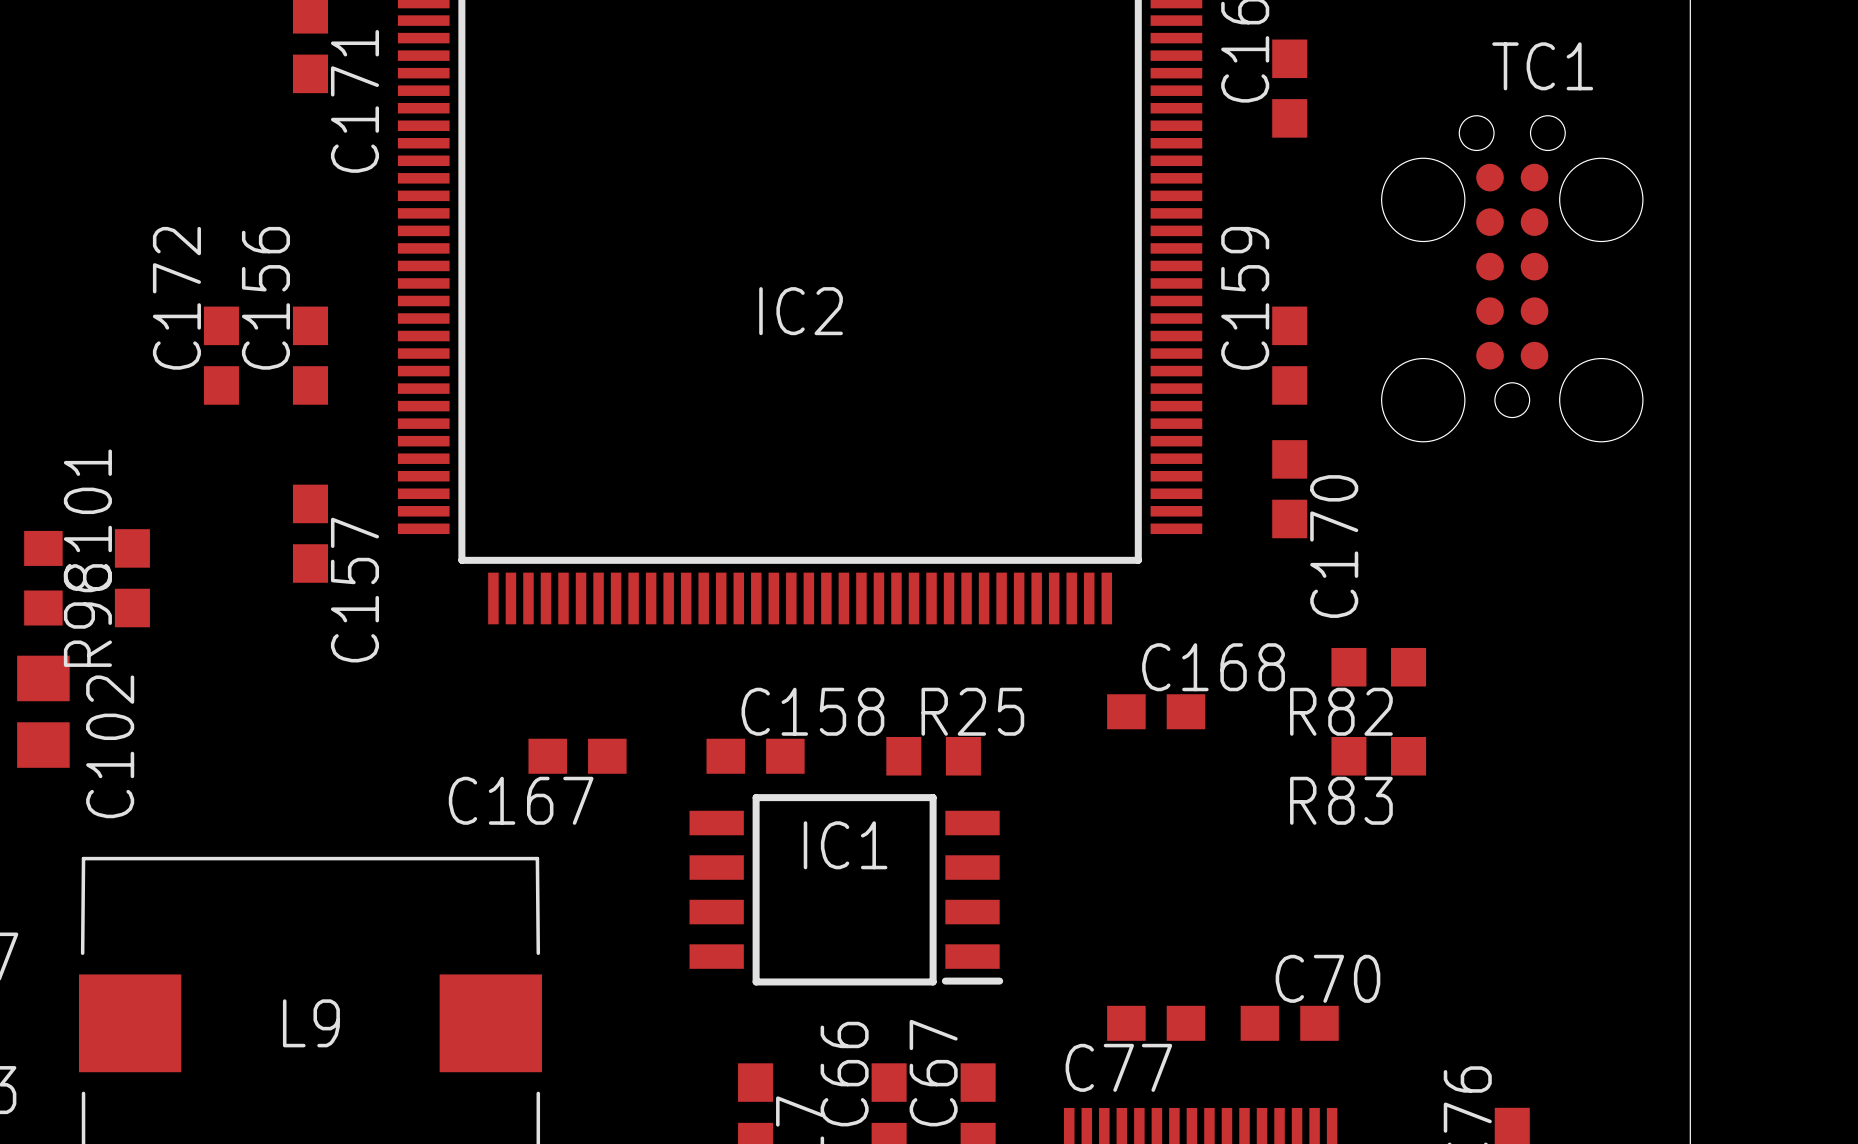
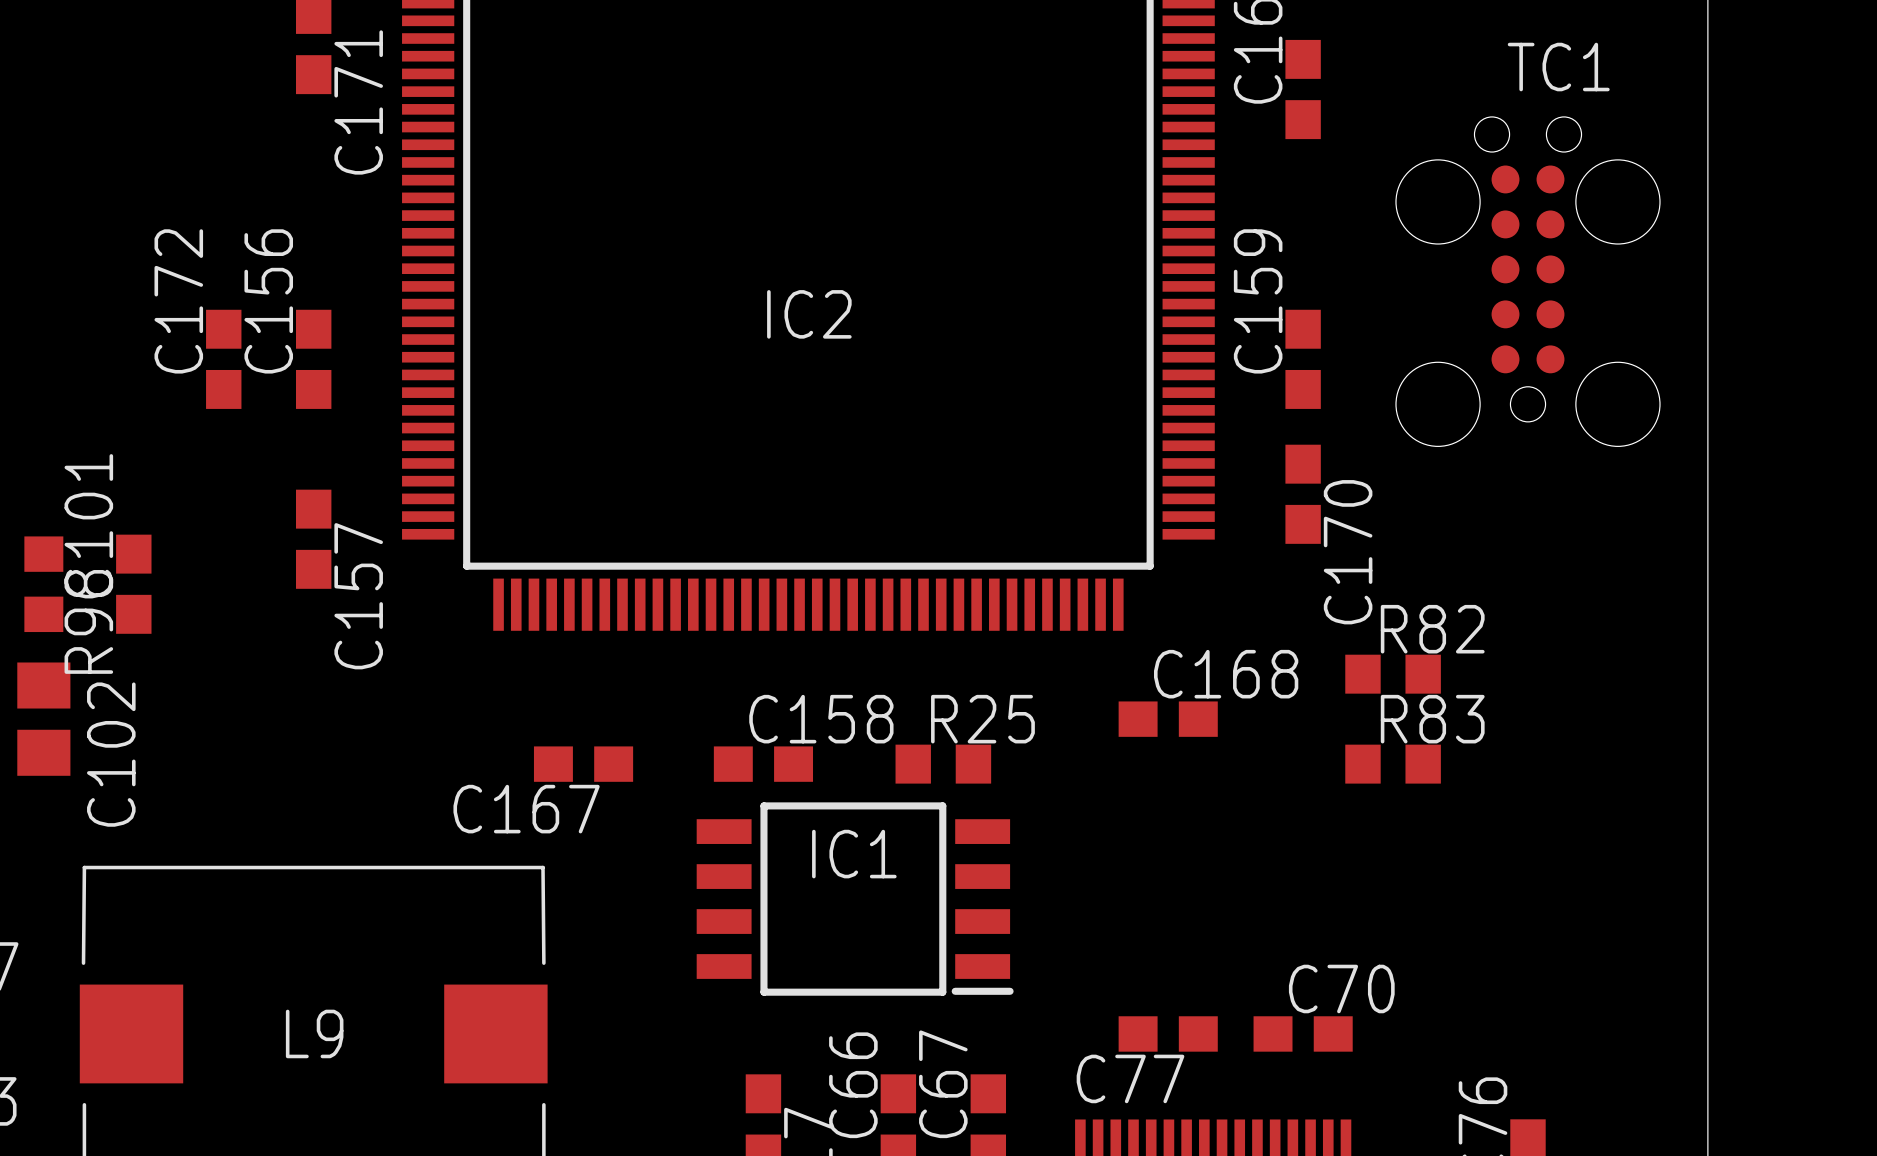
R82 name position: R82 (1341, 711) -> R82 (1432, 629)
R83 name position: R83 (1341, 800) -> R83 (1432, 719)

